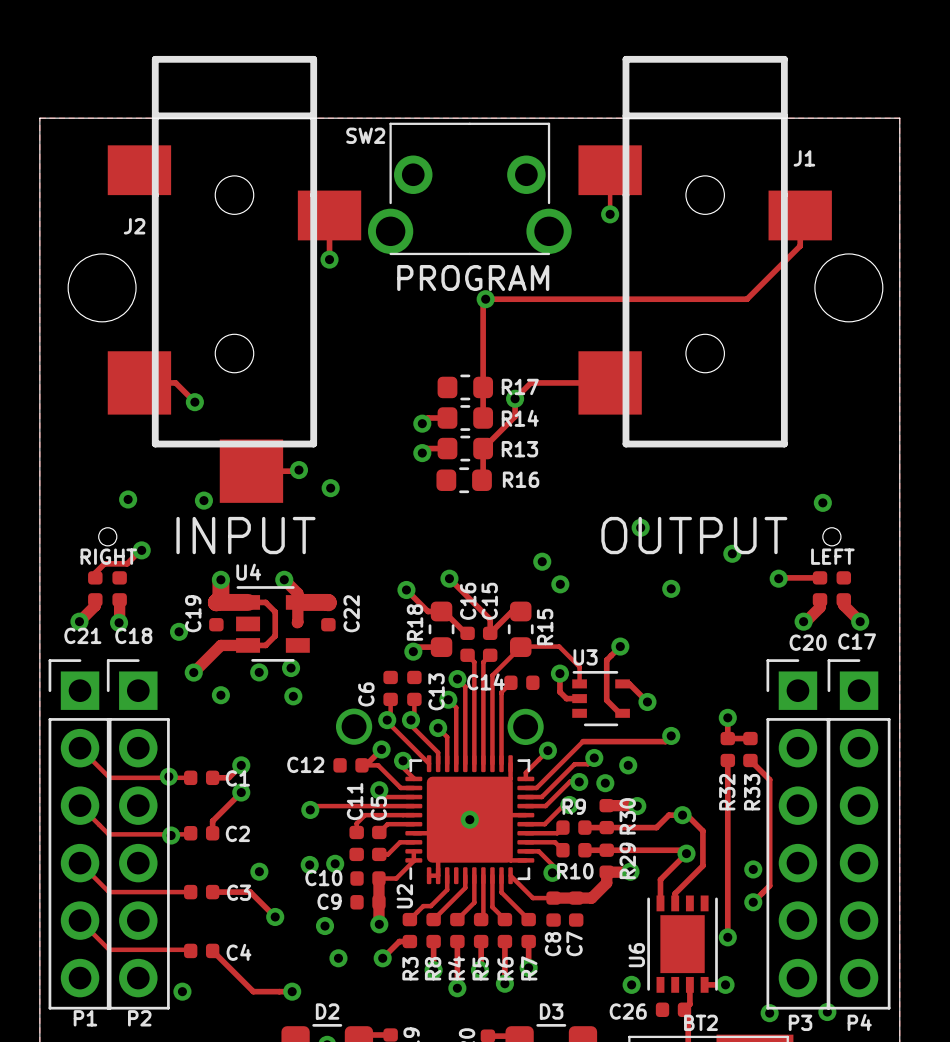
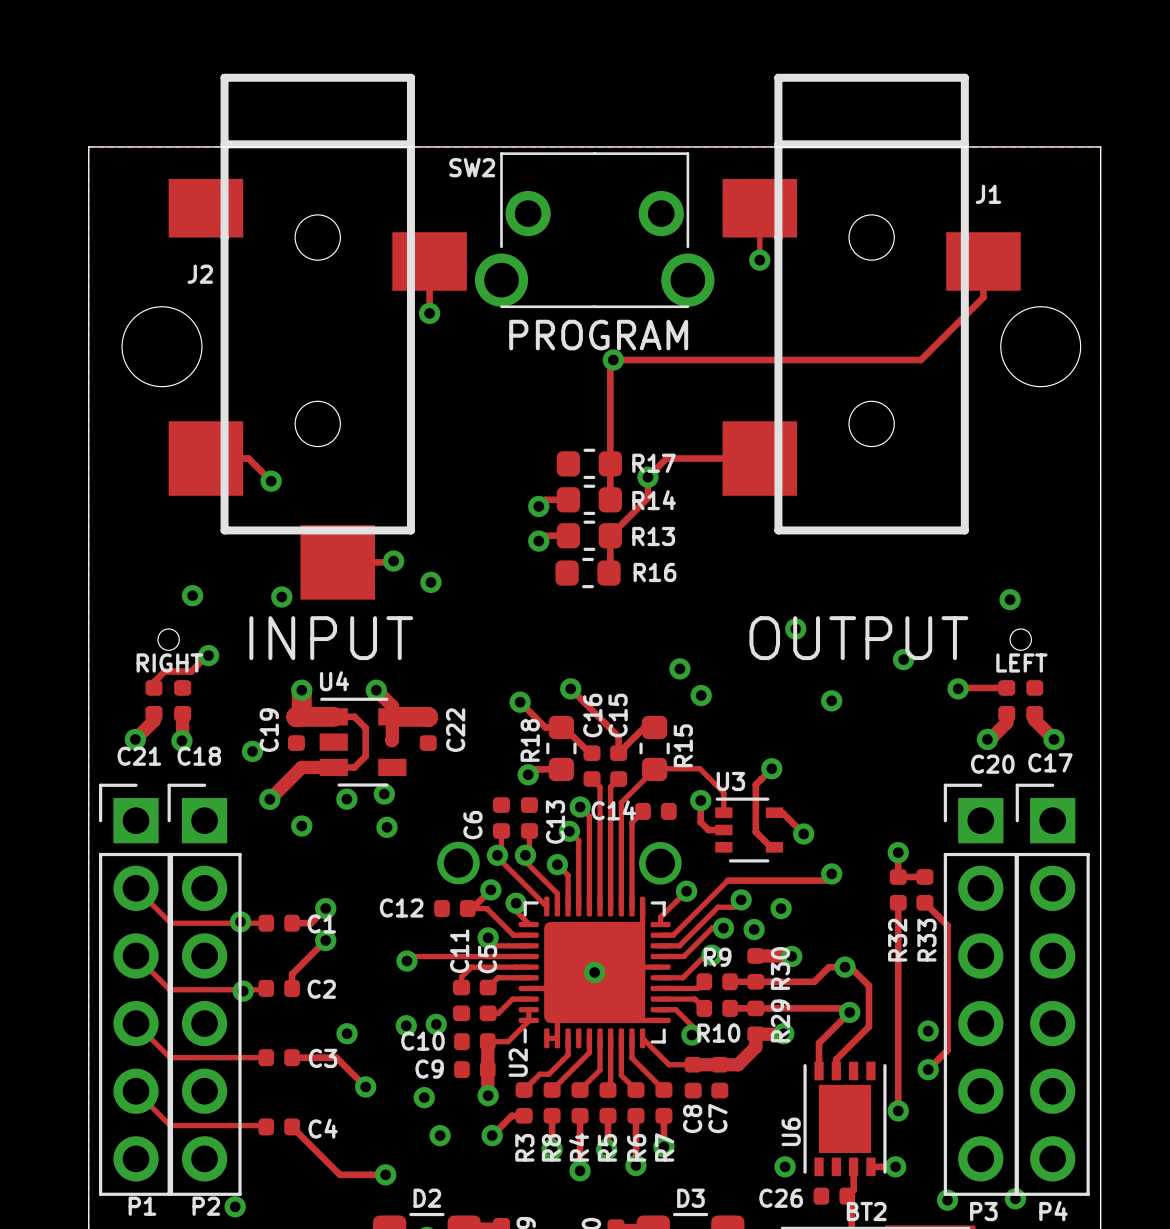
via position: (182, 991) -> (235, 1206)

